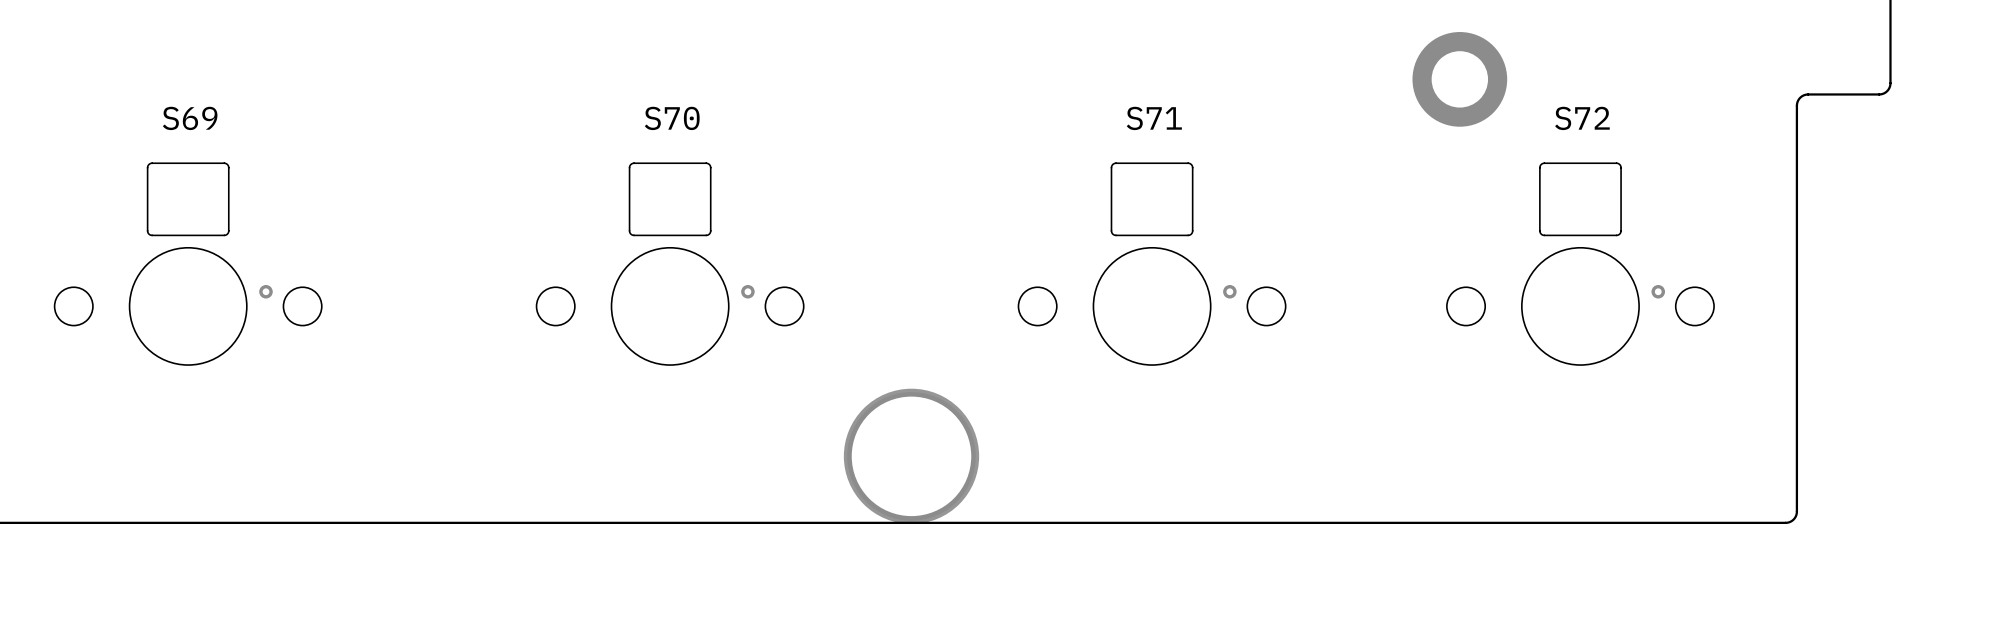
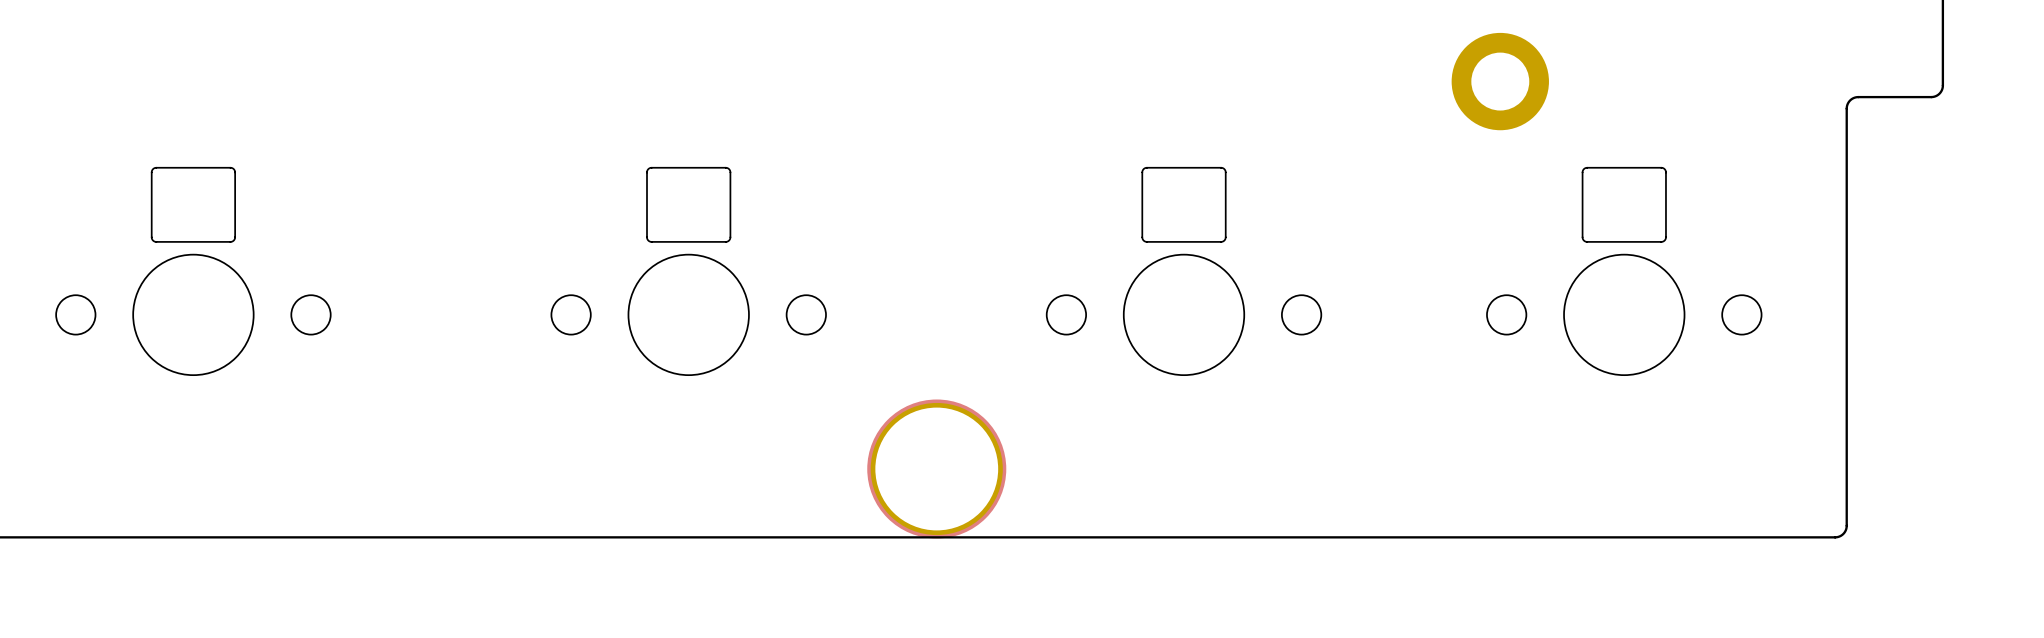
S69: (188, 306) -> none
S70: (670, 306) -> none
S71: (1152, 306) -> none
S72: (1580, 306) -> none

